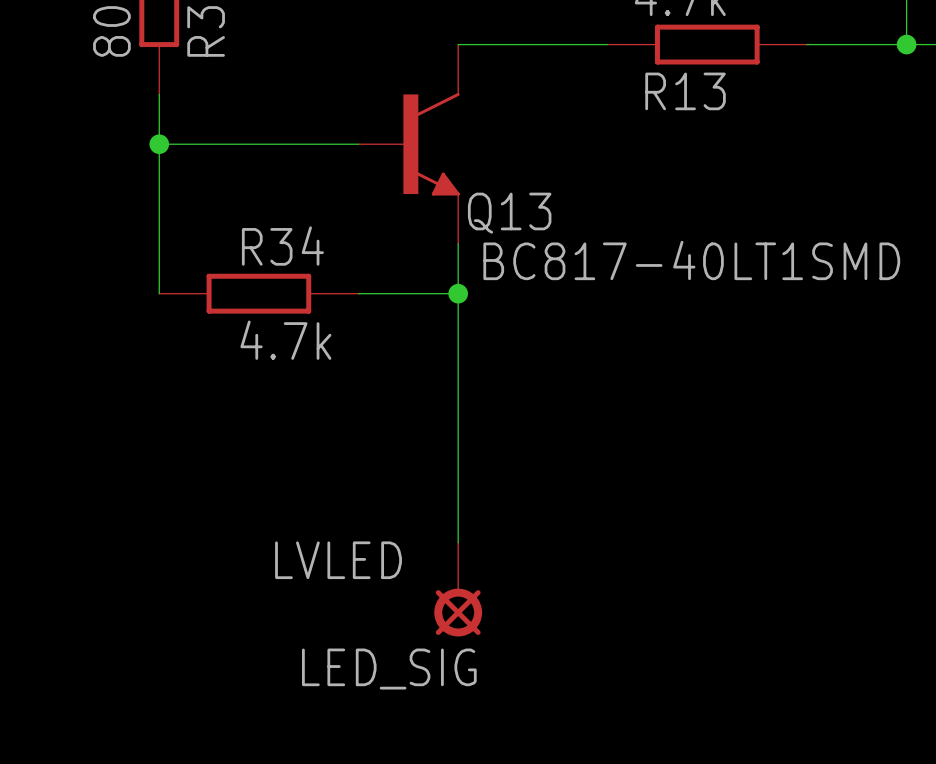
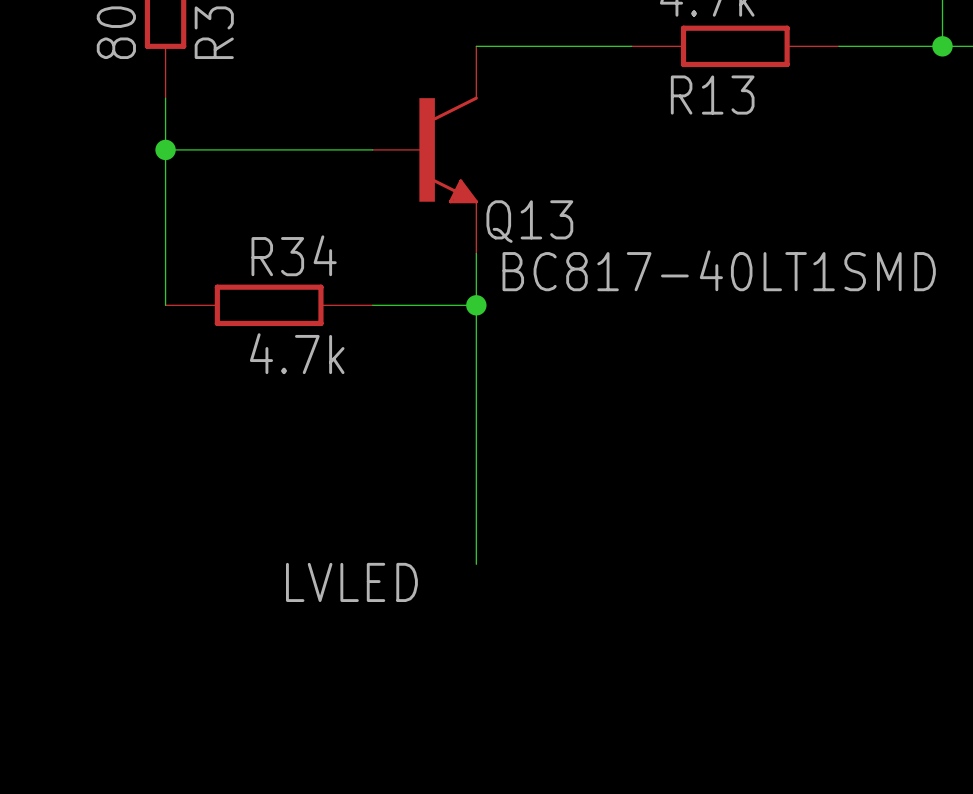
LED_SIG: (458, 589) -> none

